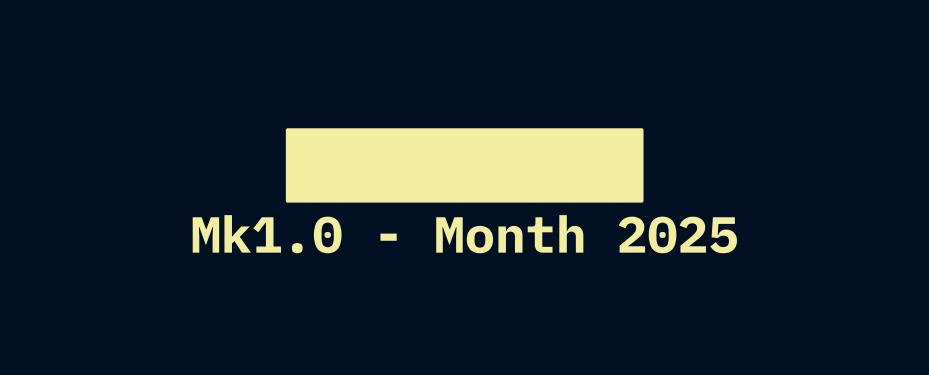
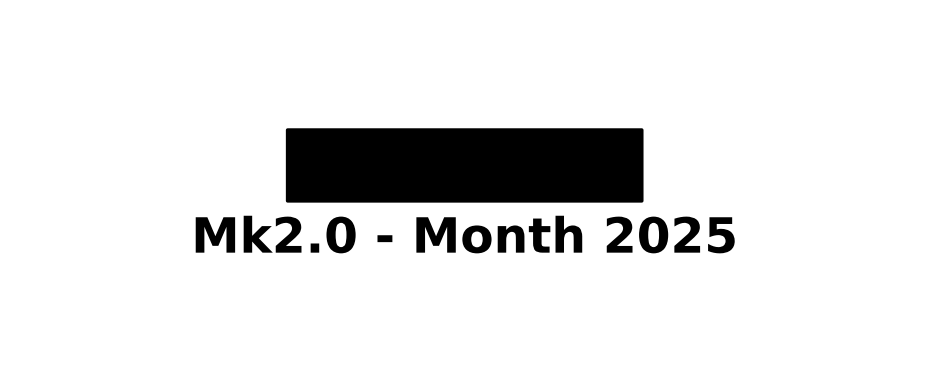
text: Mk1.0 - Month 2025 (464, 234) -> Mk2.0 - Month 2025 (465, 234)

